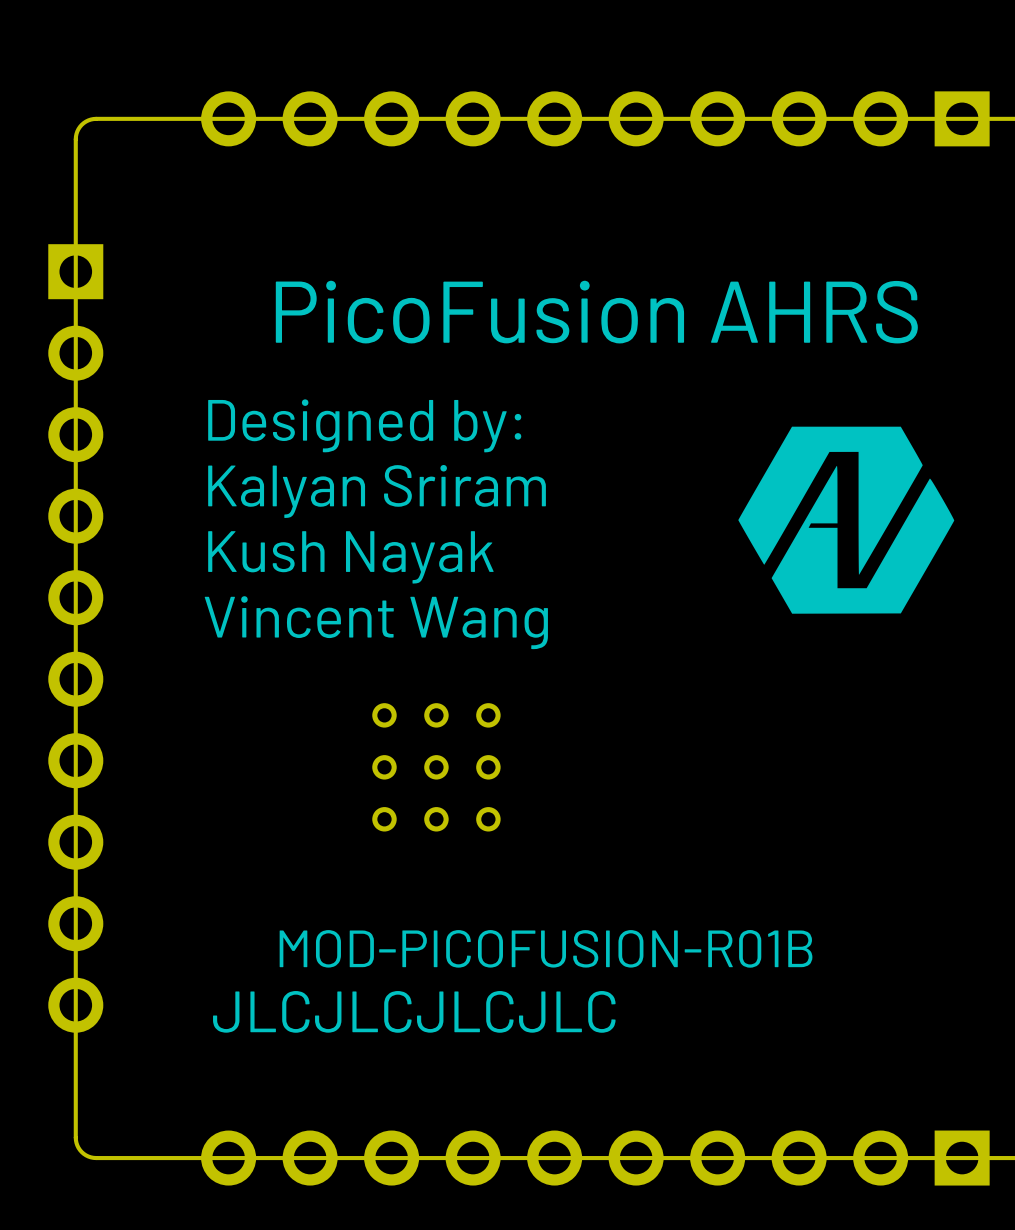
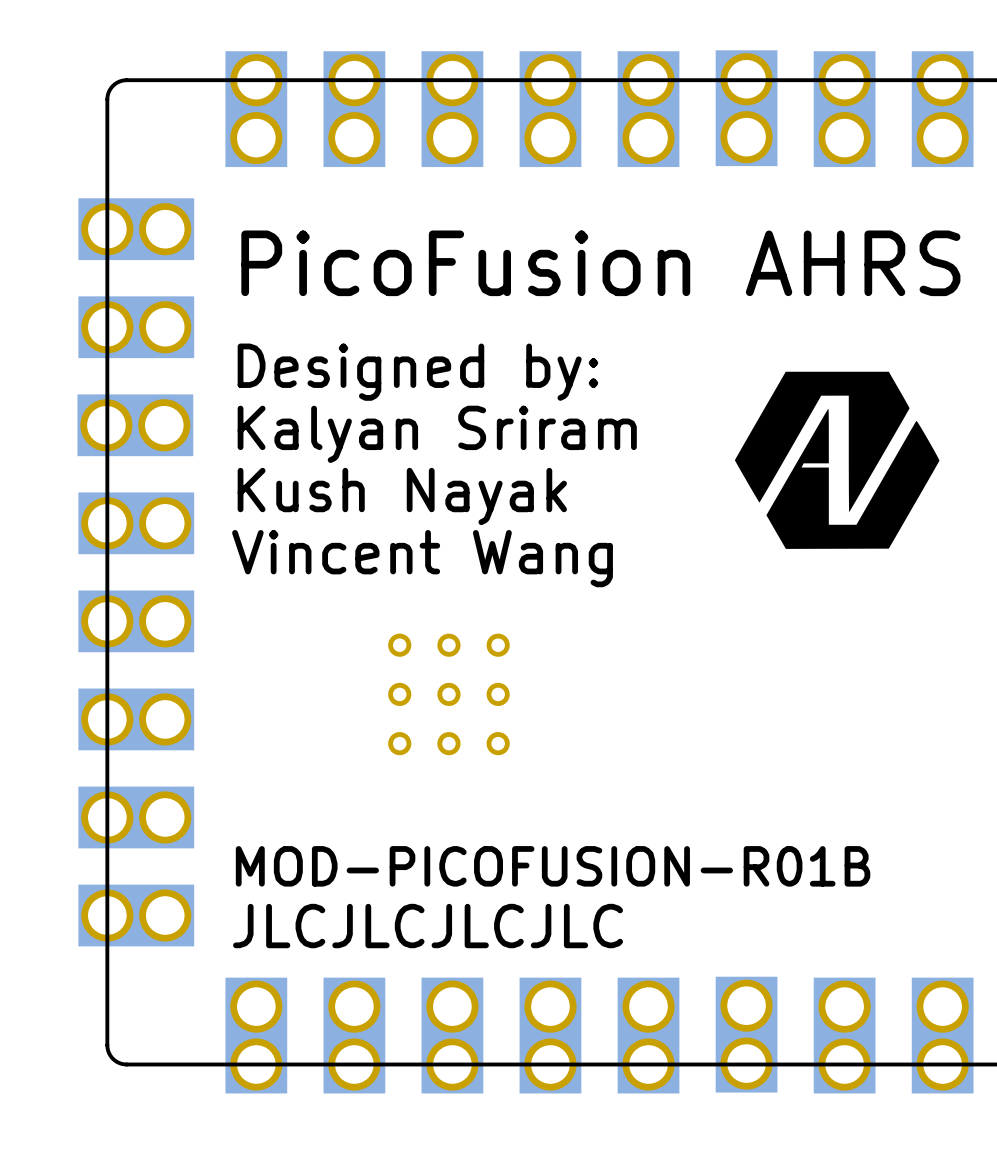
part footprint: [201, 91, 990, 147] -> [225, 50, 974, 168]
part footprint: [48, 244, 104, 1033] -> [77, 198, 195, 947]
part footprint: [201, 1130, 990, 1186] -> [225, 976, 974, 1094]

